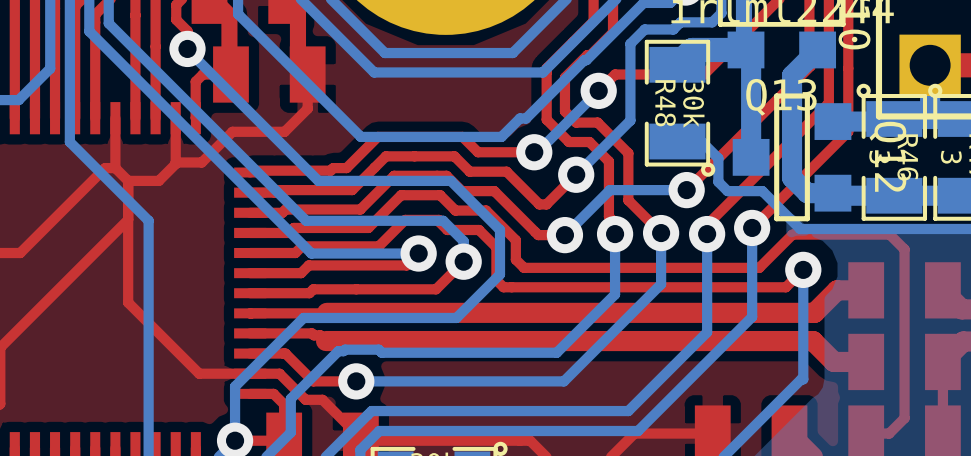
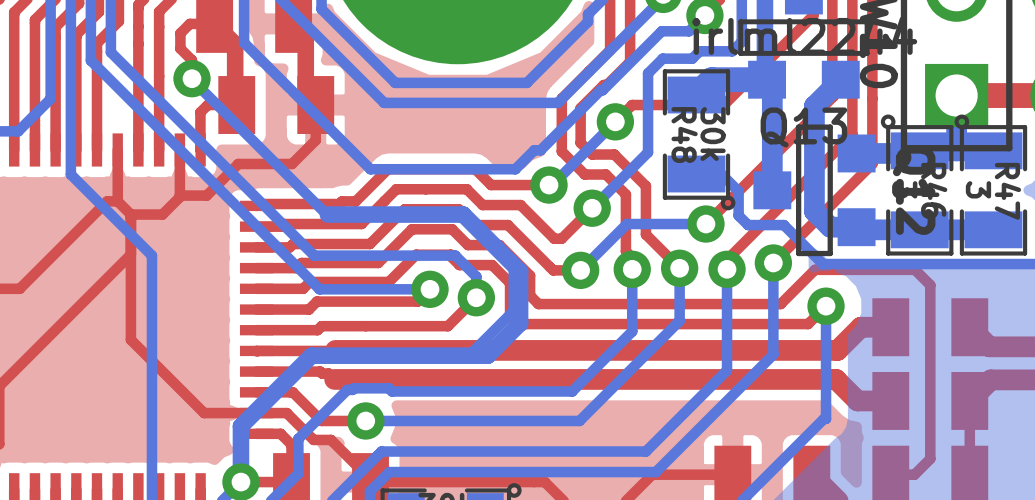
bottom track: none -> (463, 214) (520, 271) (520, 323) (487, 355) (311, 355) (240, 426)
bottom track width: thin (450, 180) (319, 180) -> thick (463, 214) (327, 214)
bottom track width: thin (235, 386) (235, 440) -> thick (240, 426) (240, 482)

